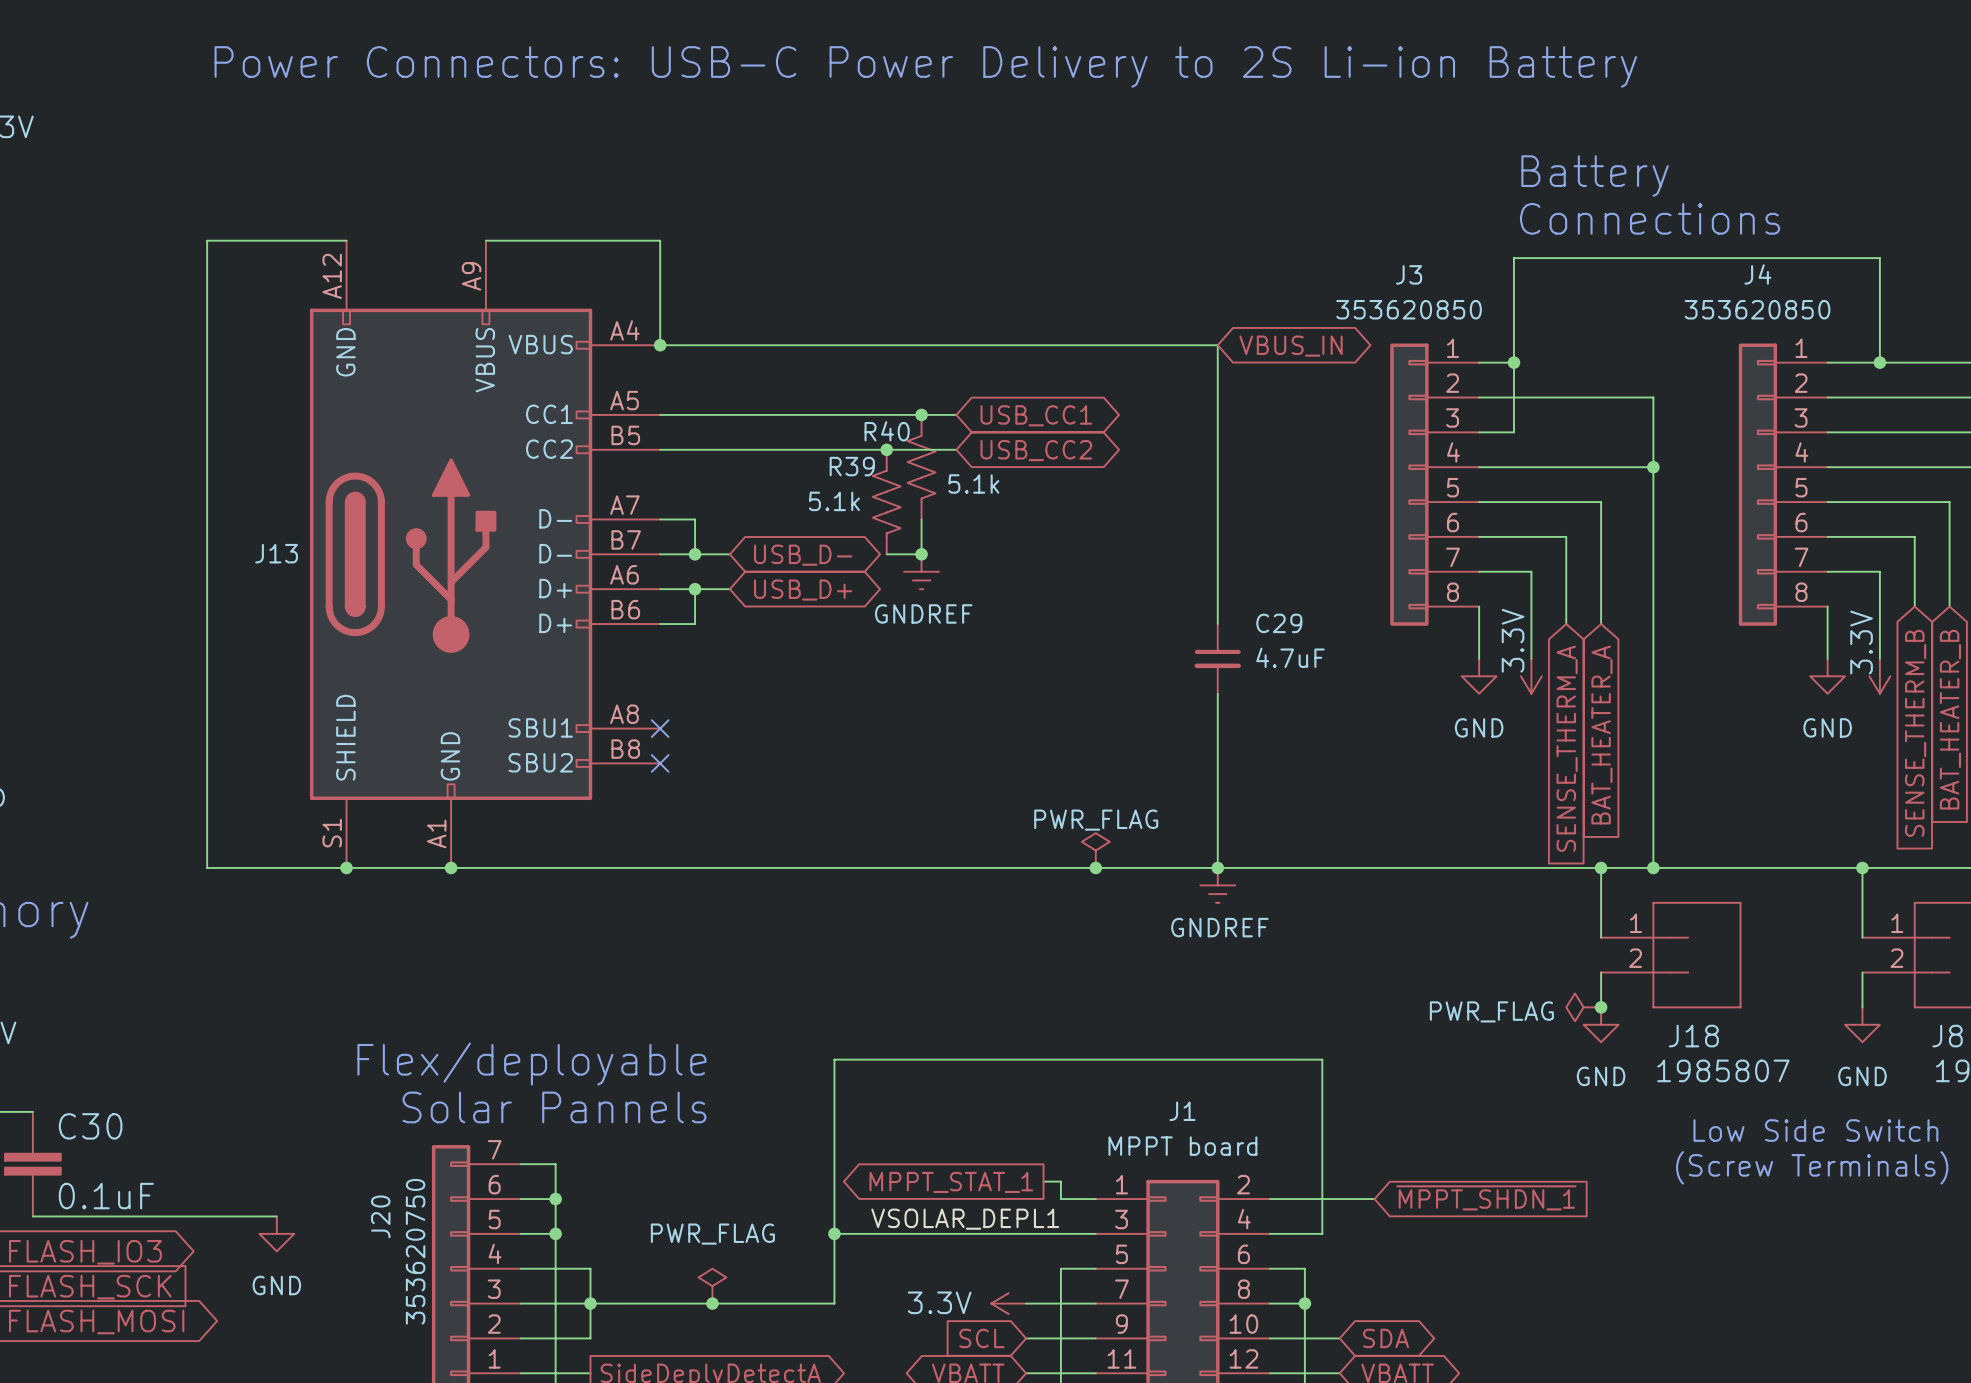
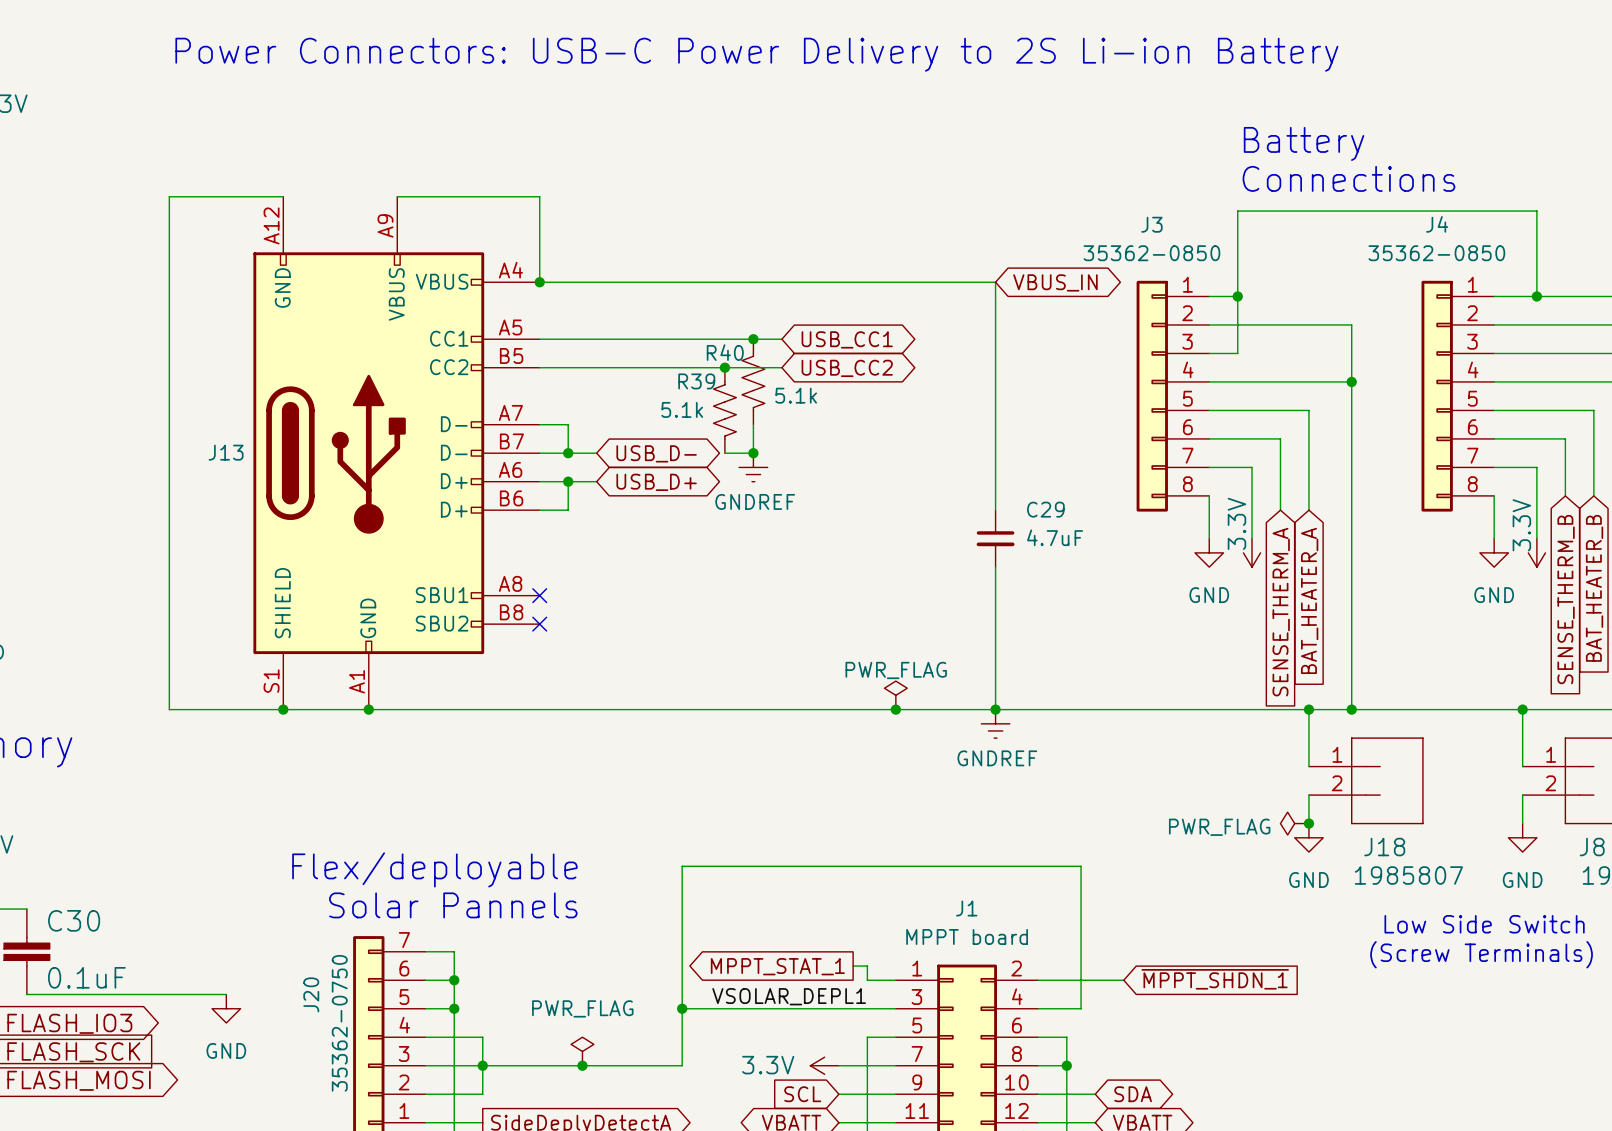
J3 value: 353620850 (1409, 309) -> 35362-0850 (1151, 253)
J4 value: 353620850 (1757, 309) -> 35362-0850 (1436, 253)
J20 value: 353620750 (415, 1251) -> 35362-0750 (339, 1023)

